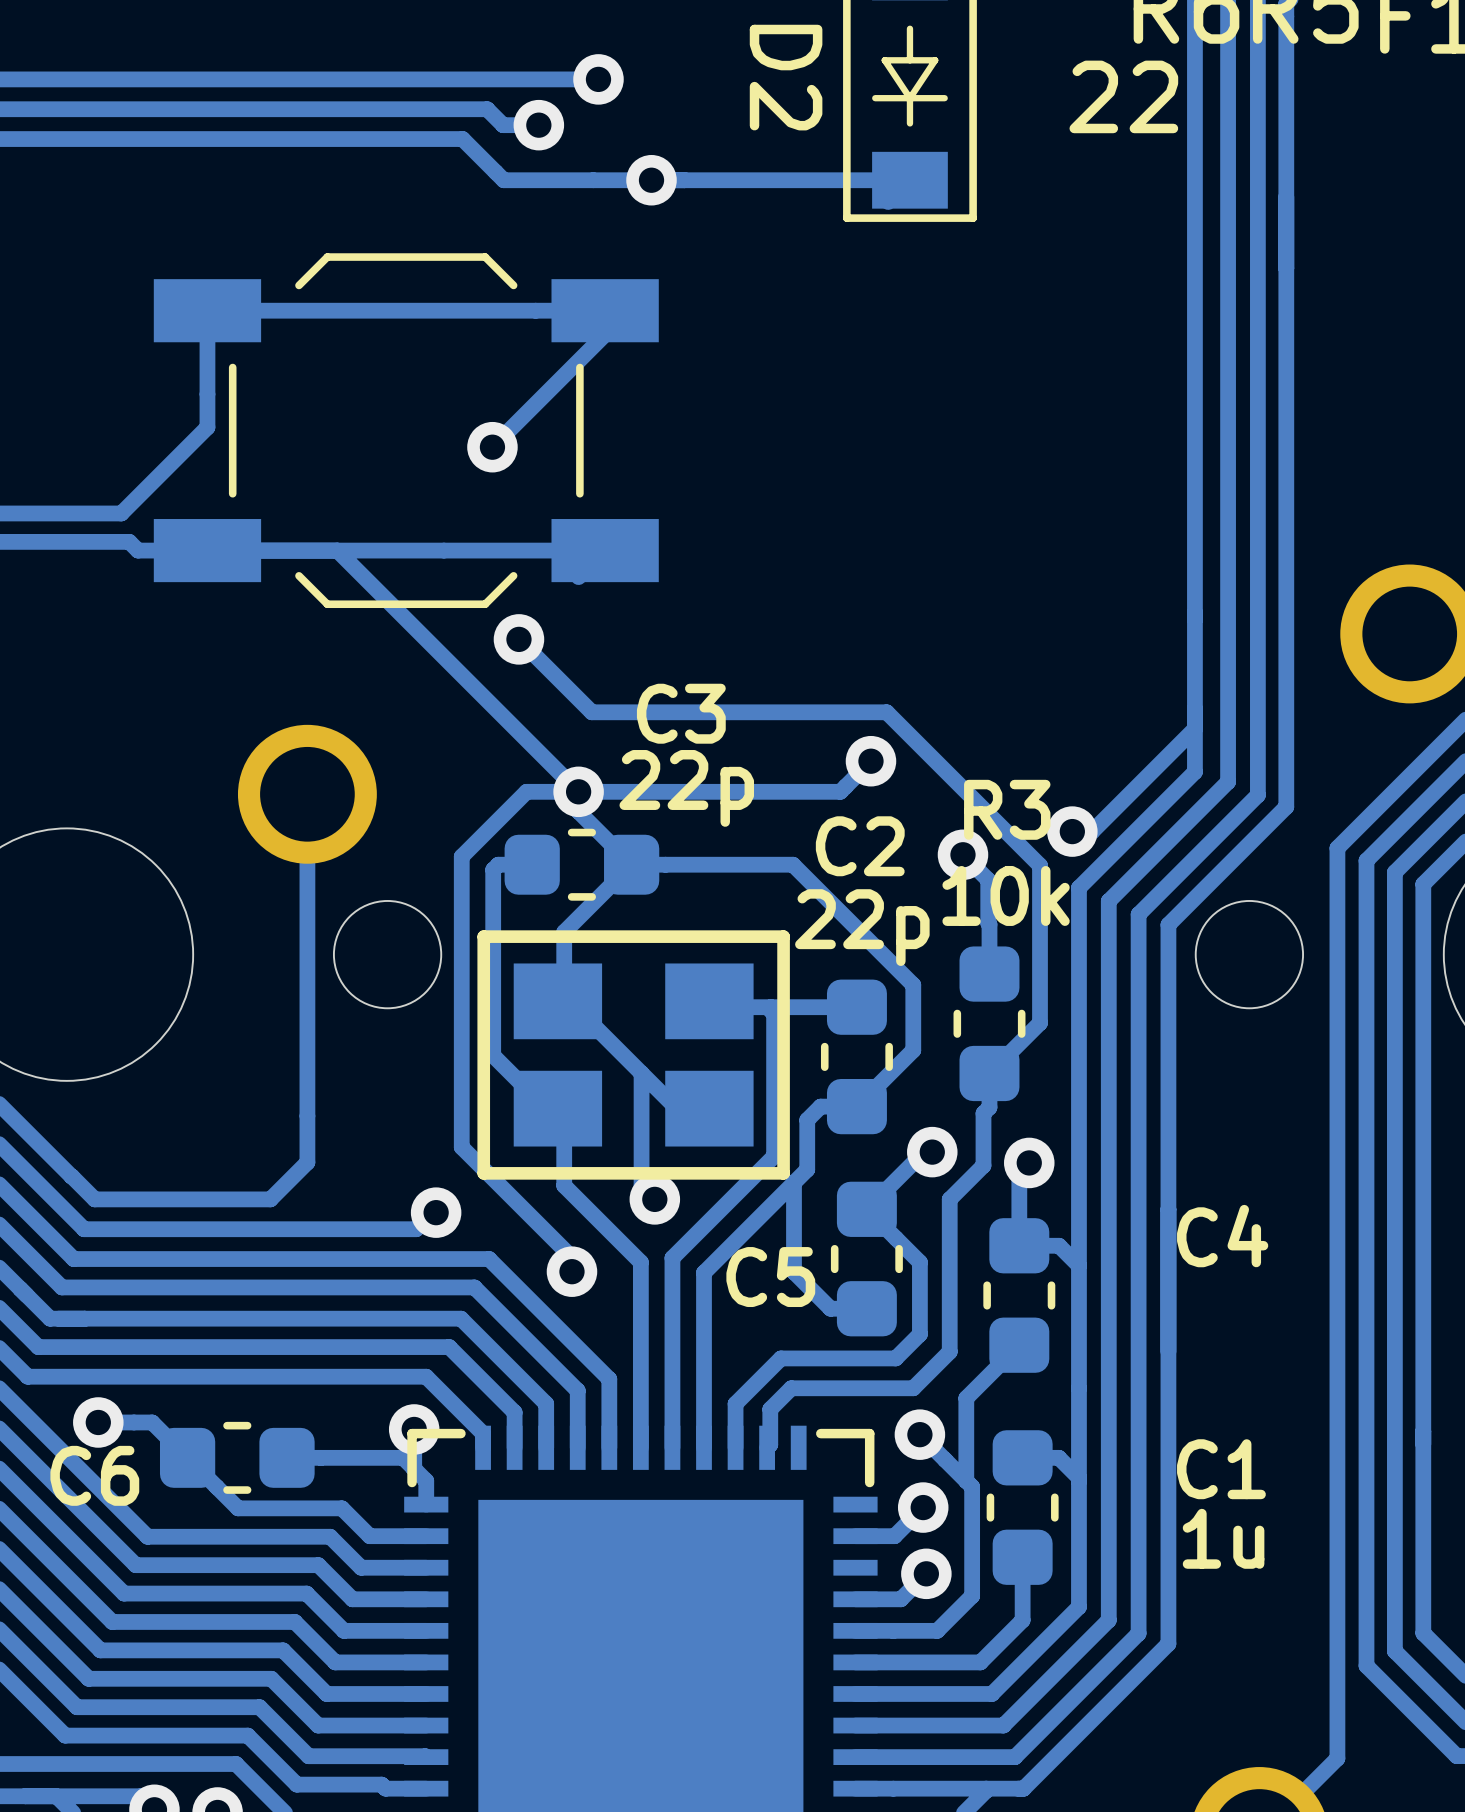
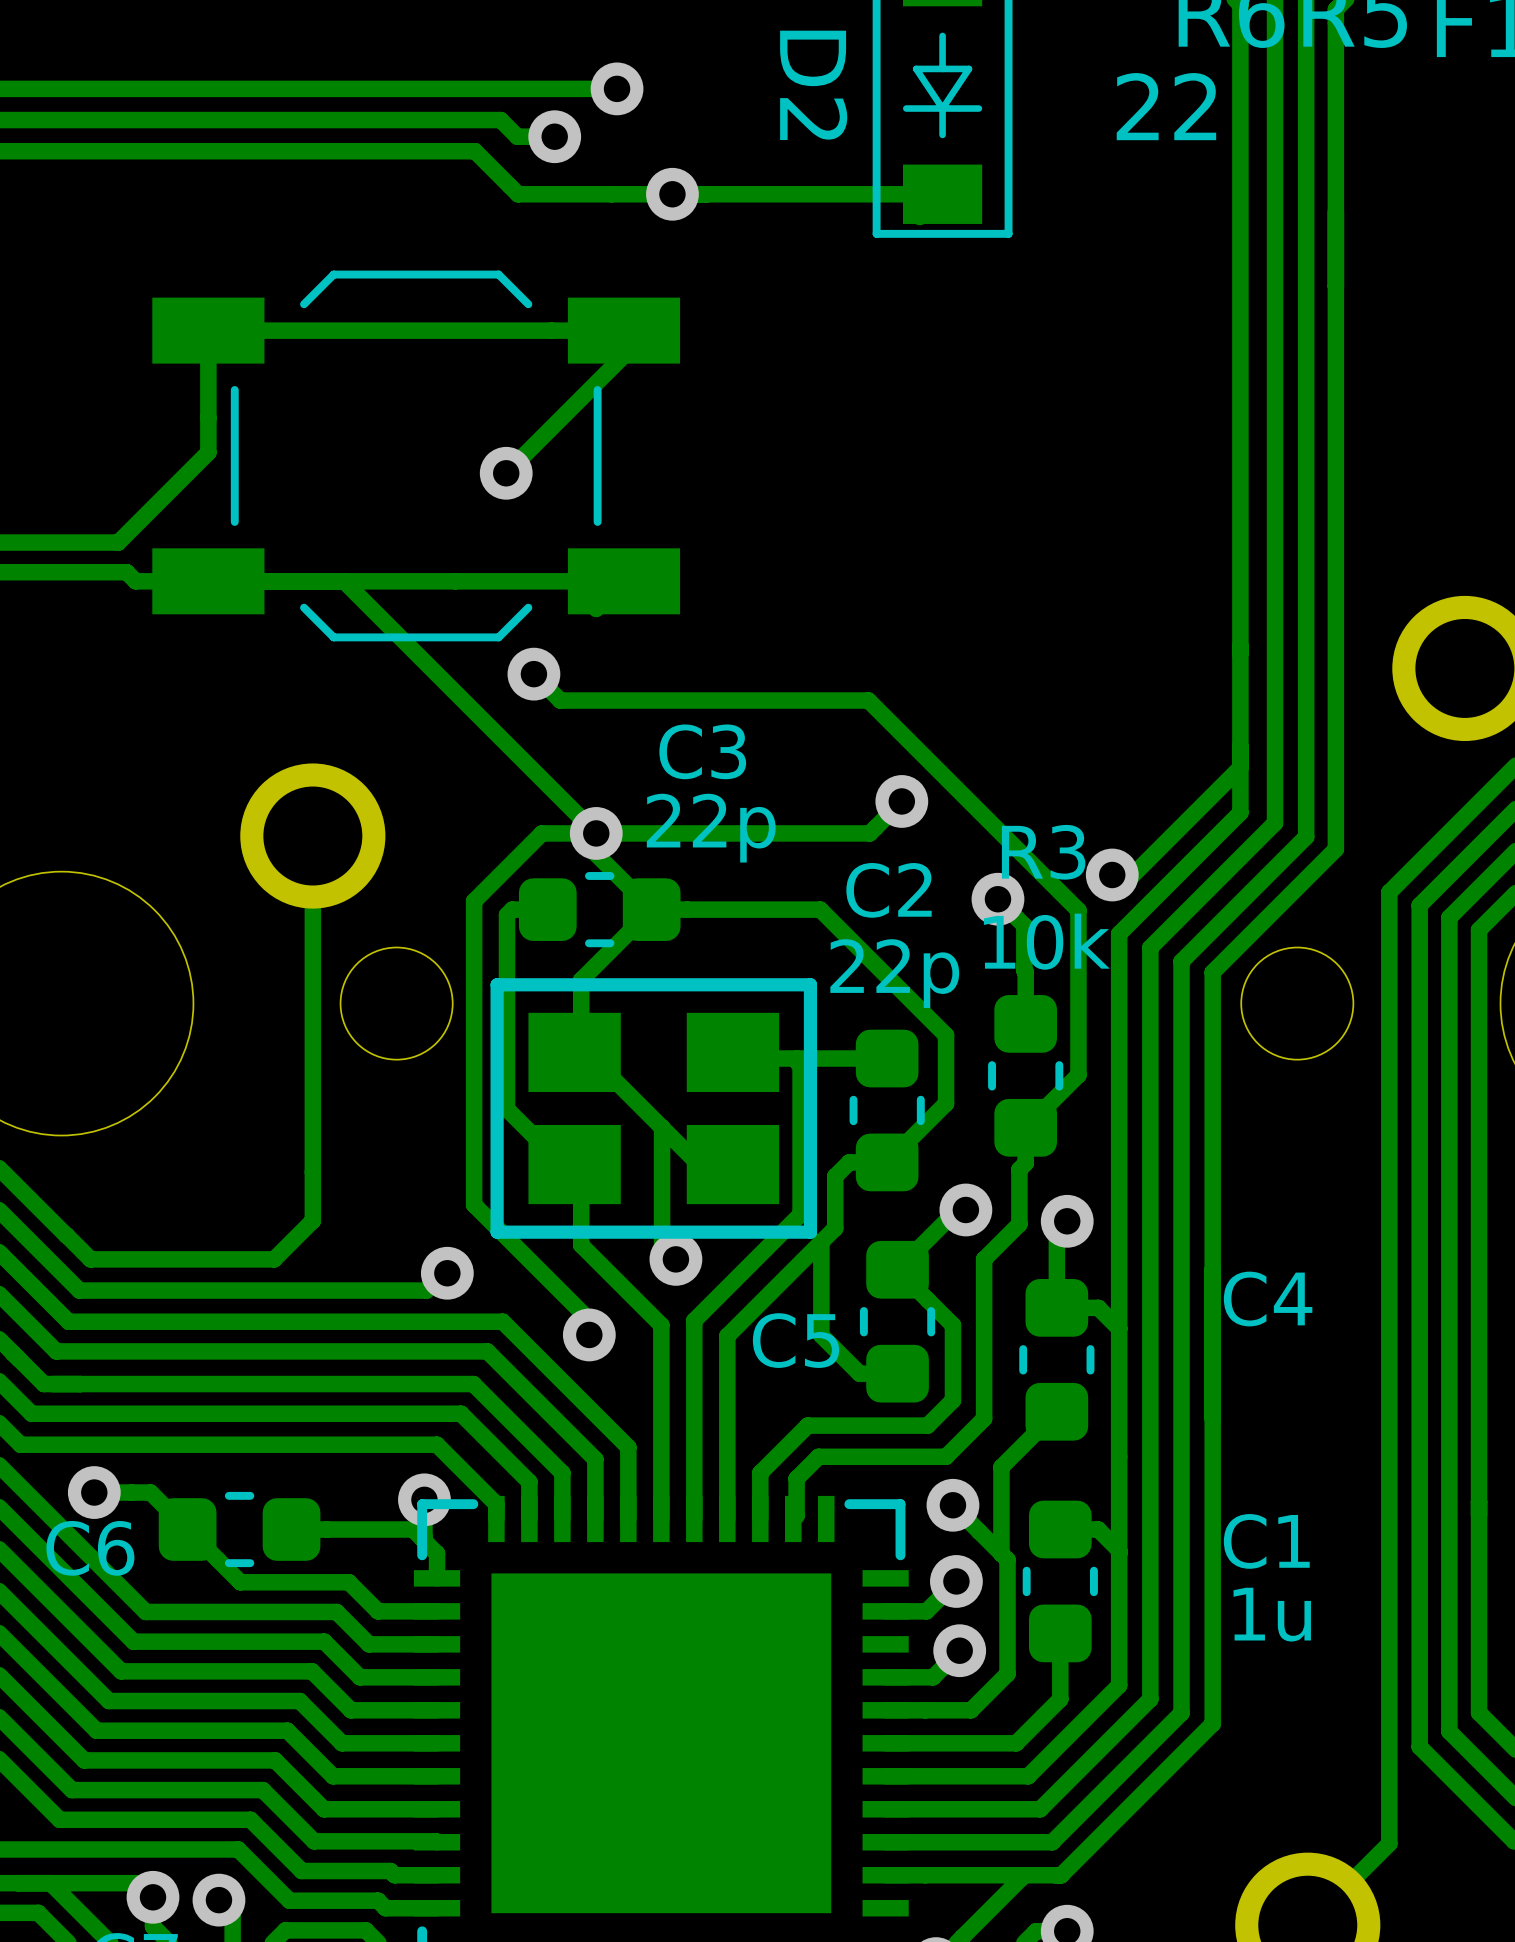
track: (544, 664) (591, 712) (886, 712) -> (560, 700) (868, 700) (918, 750)

